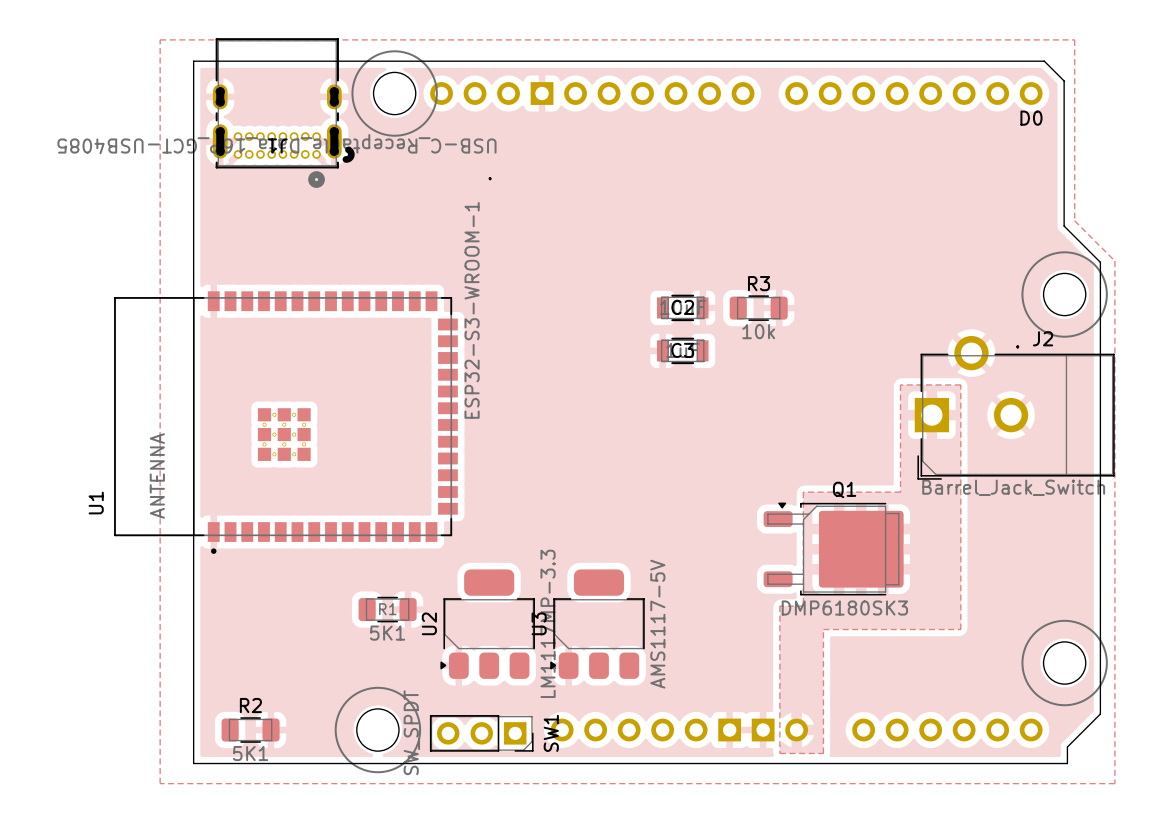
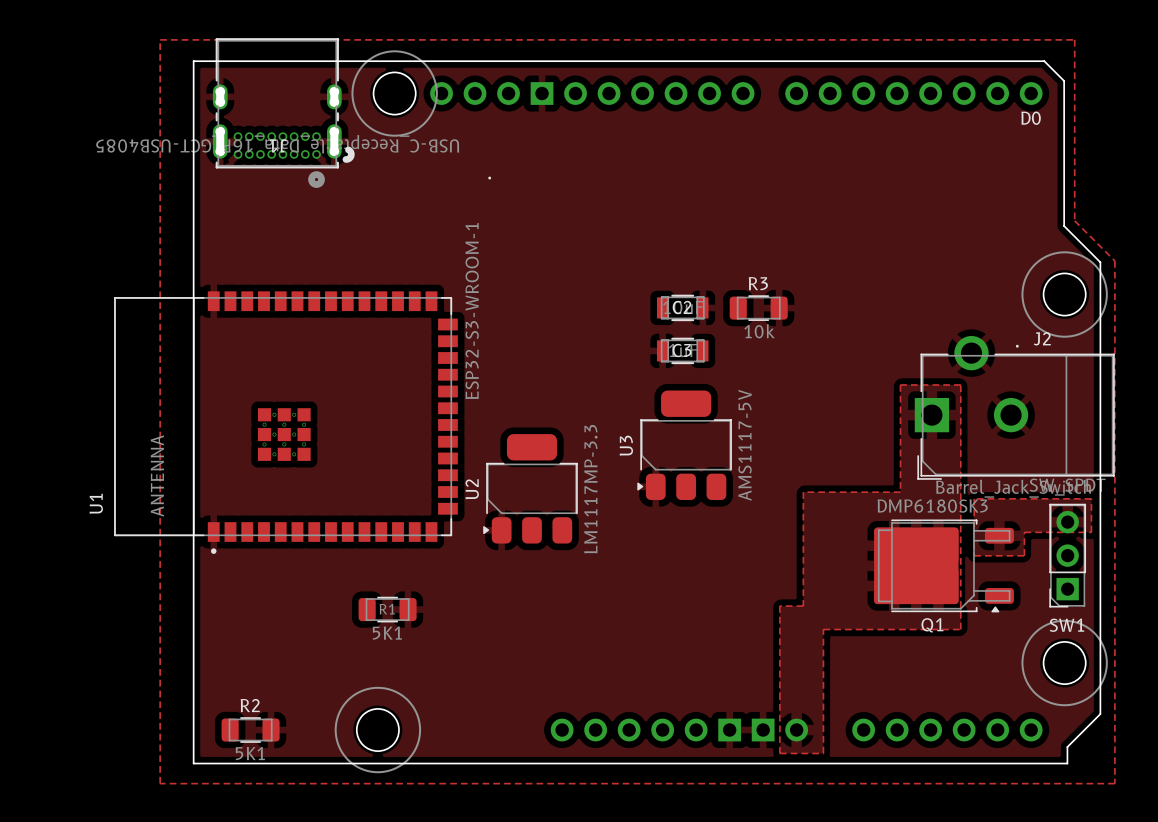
top zone outline: none -> (974, 498) (1091, 498) (1091, 532) (1024, 532) (1024, 555) (974, 555) (974, 498)
Q1 rotation: 0° (833, 549) -> 180° (944, 565)
Q1 position: (833, 549) -> (944, 565)
U2 position: (487, 624) -> (530, 488)
U3 position: (597, 624) -> (684, 445)
SW1 rotation: 0° (481, 733) -> 90° clockwise (1067, 555)
SW1 position: (481, 733) -> (1067, 555)

